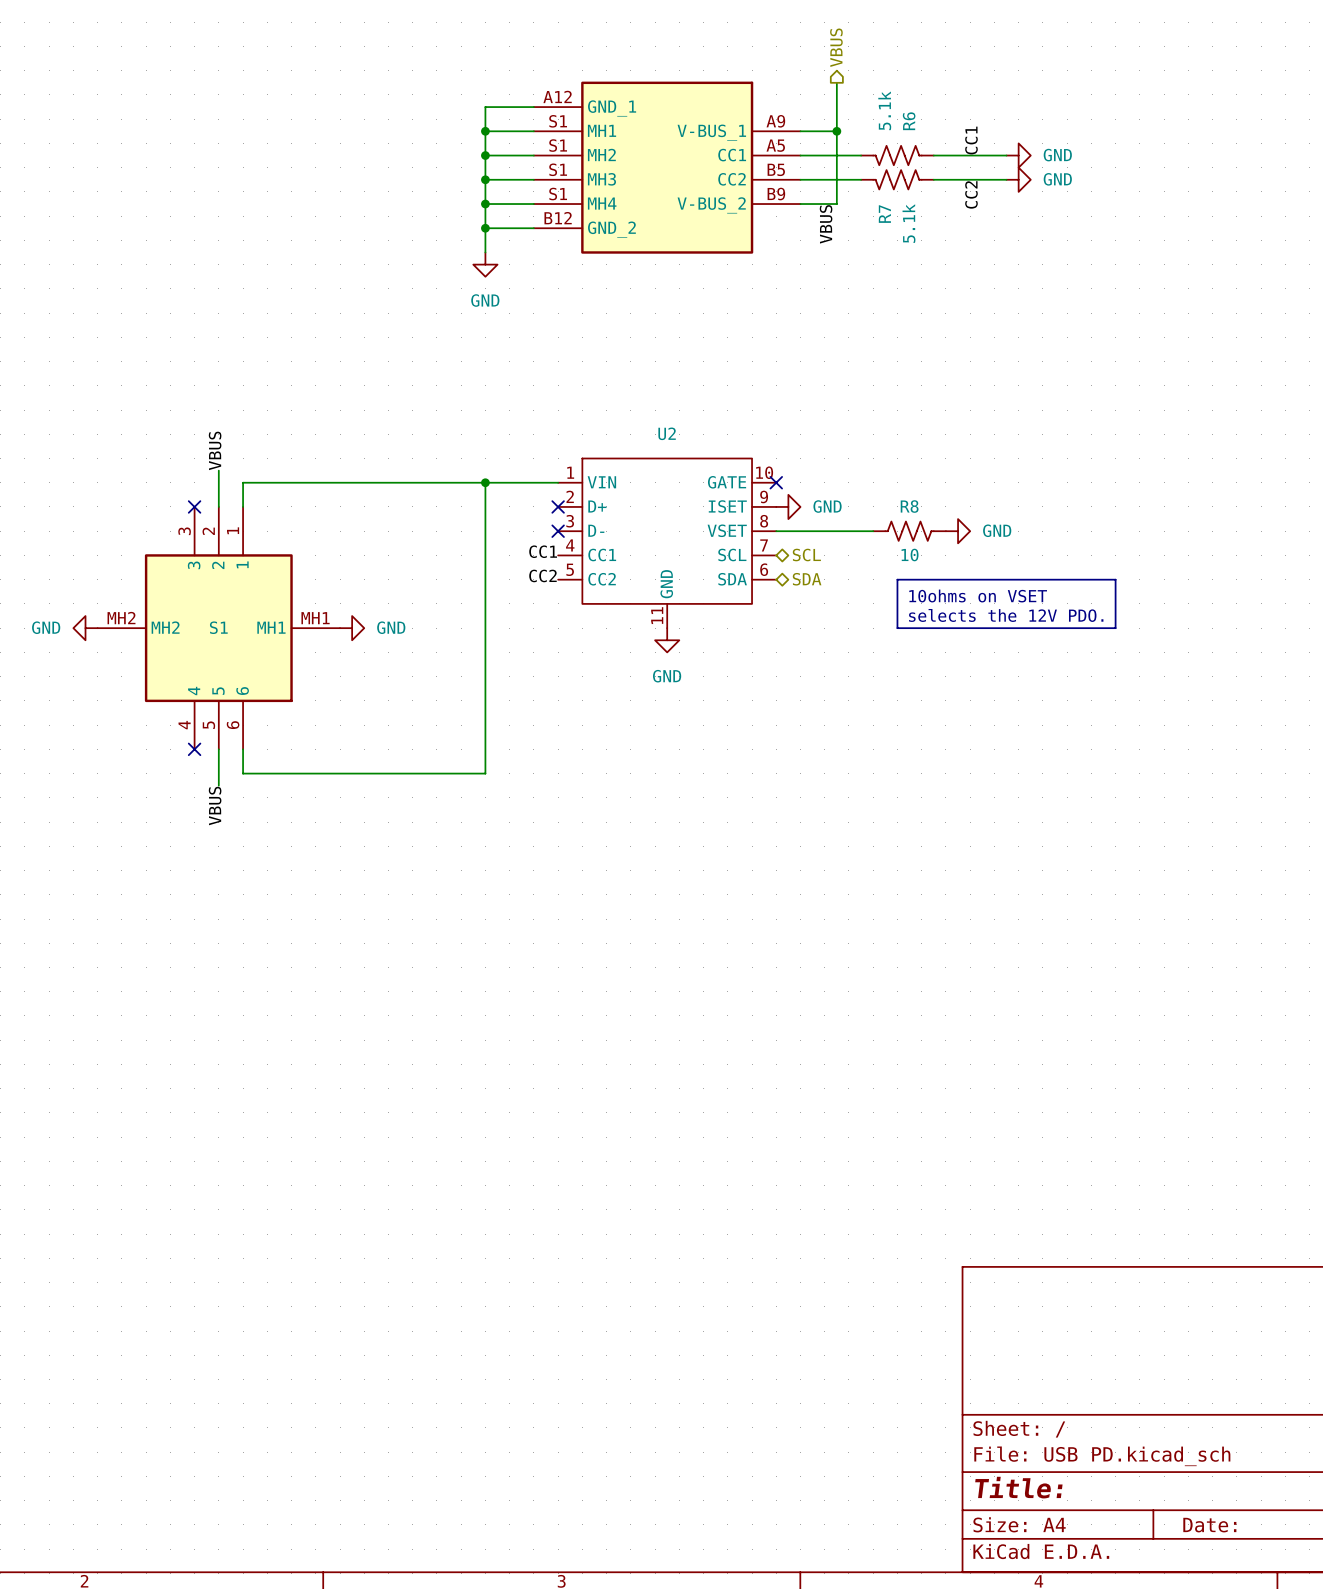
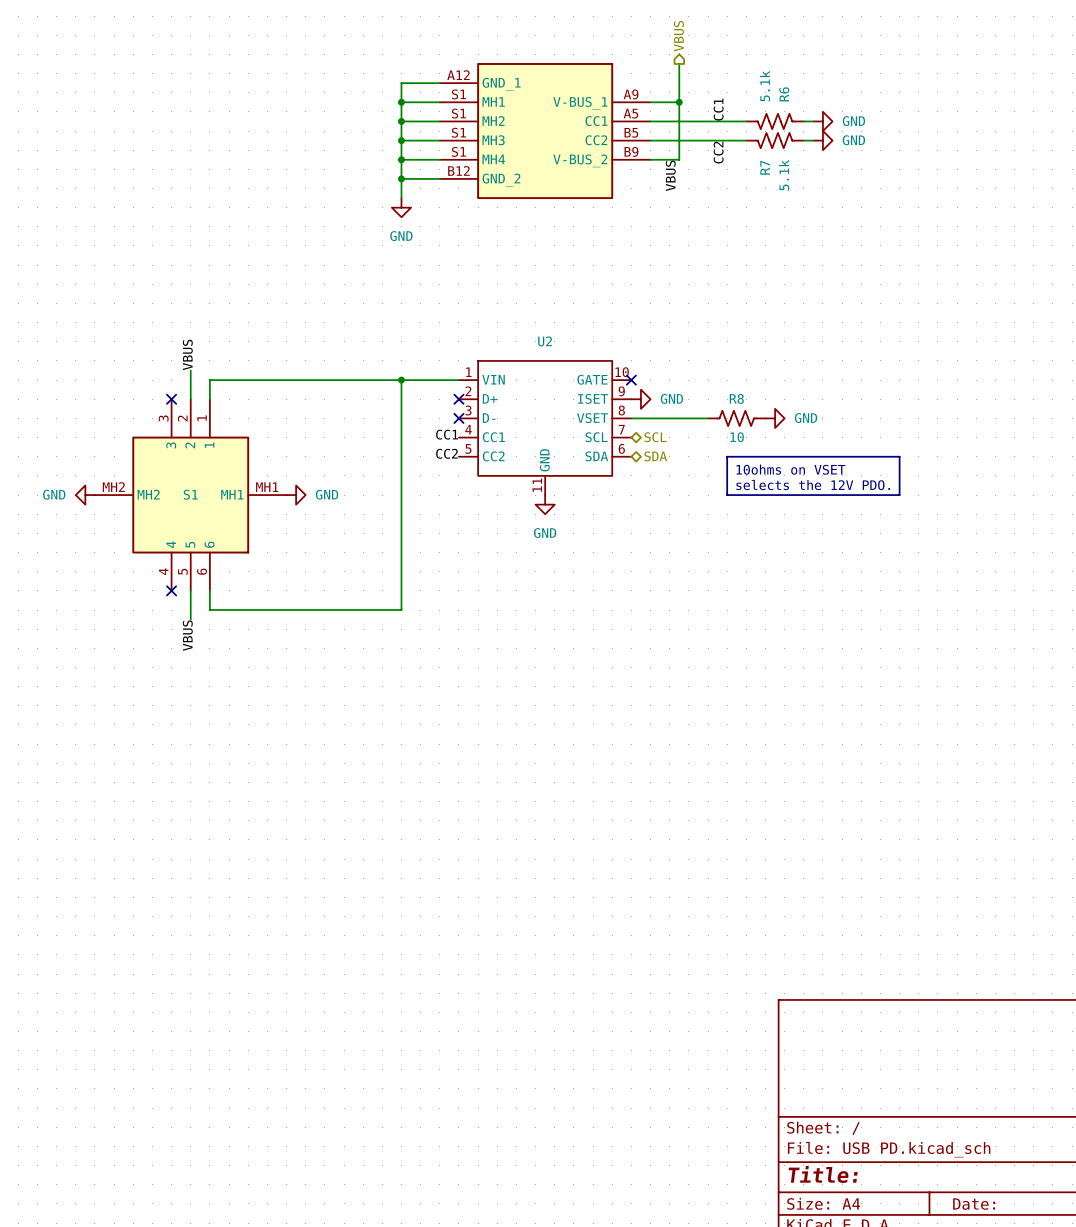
label position: CC1 (971, 140) -> CC1 (718, 109)
R6 position: (897, 155) -> (775, 121)
R7 position: (897, 179) -> (775, 140)
label position: CC2 (971, 194) -> CC2 (718, 152)

